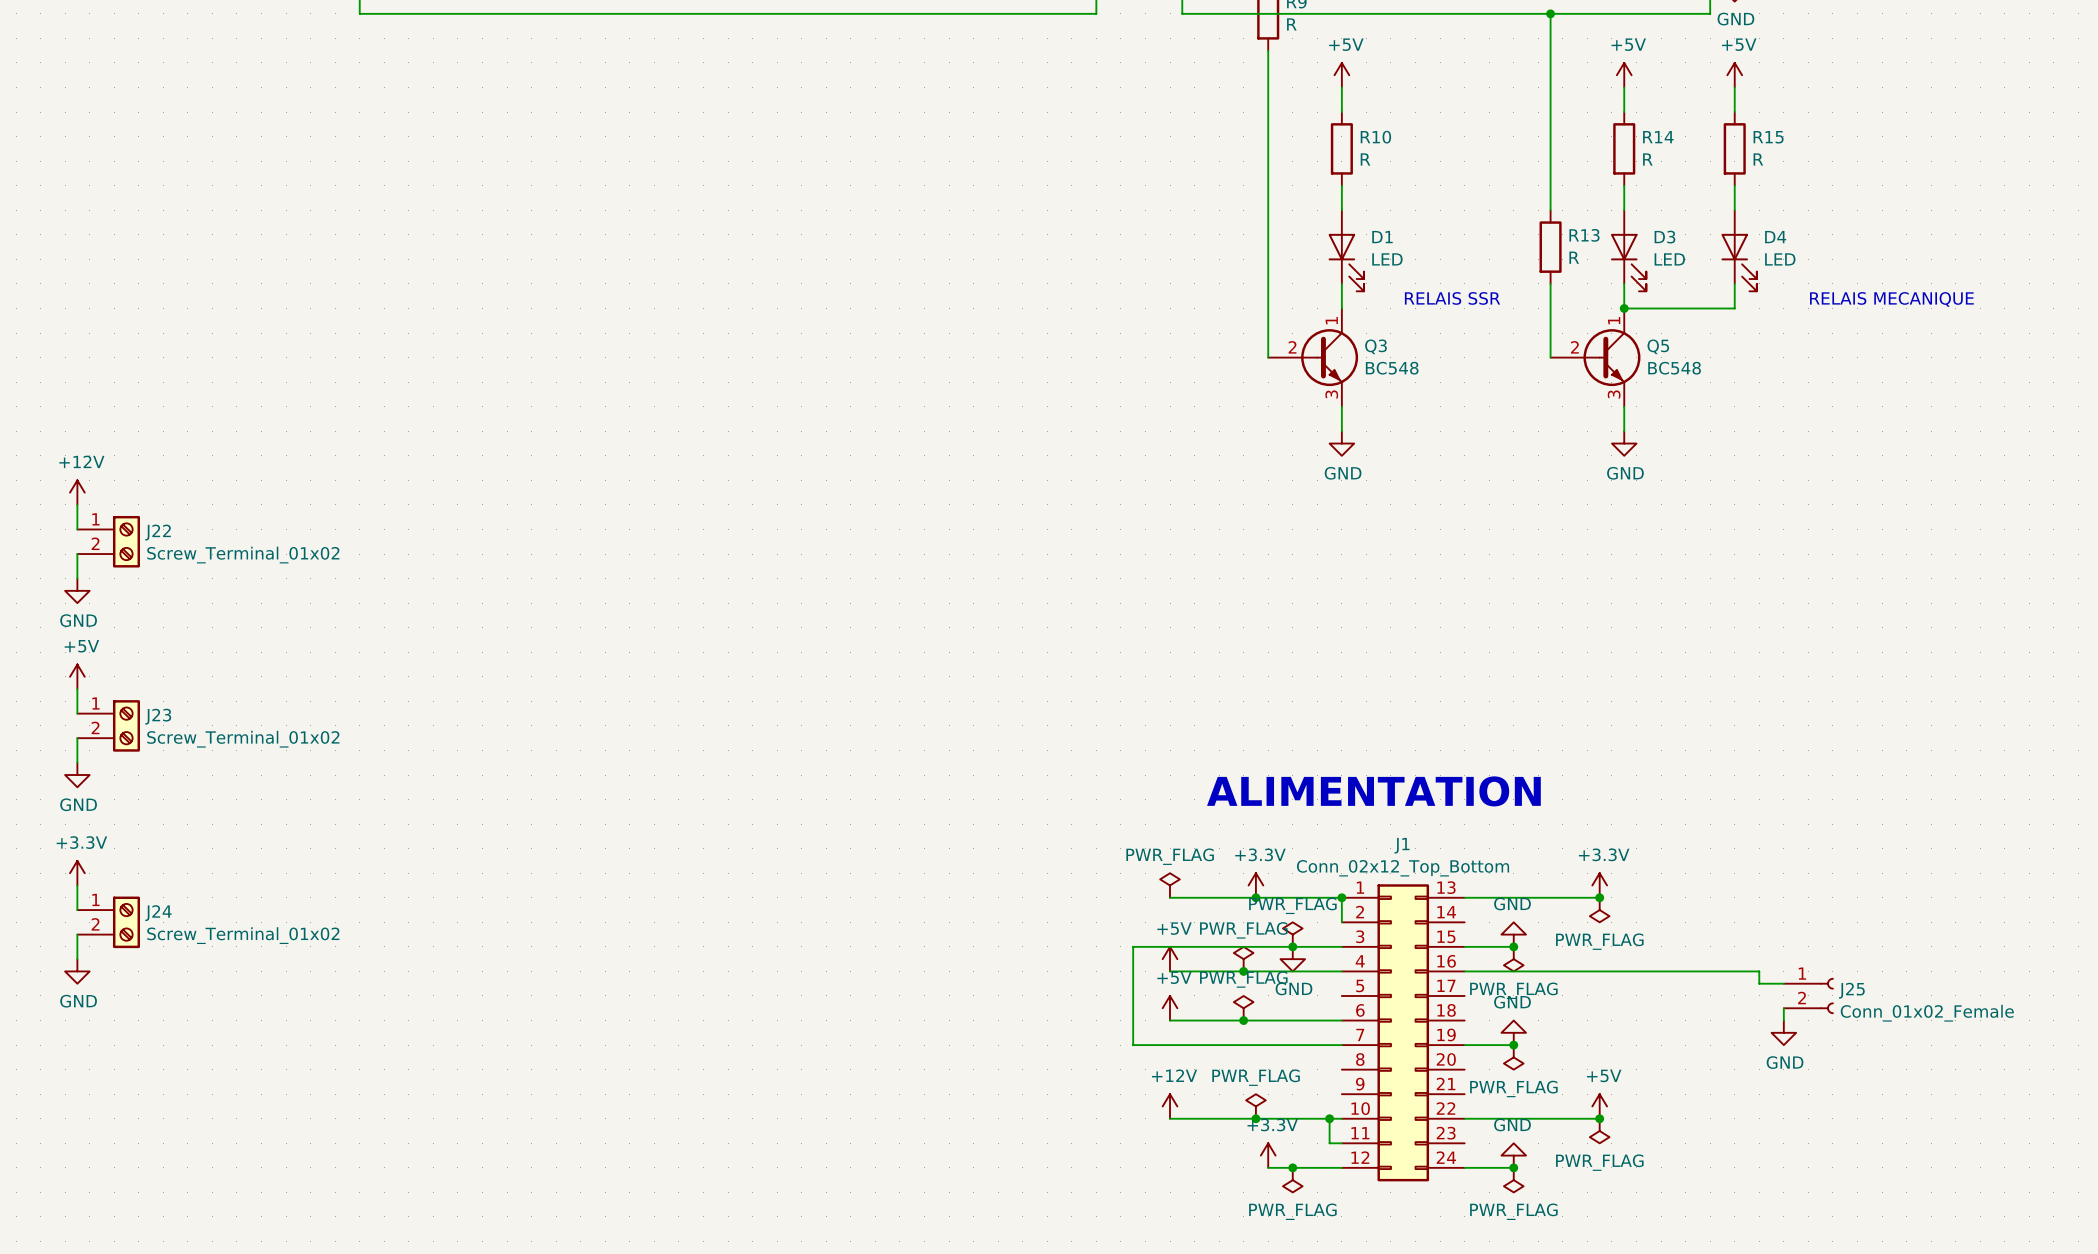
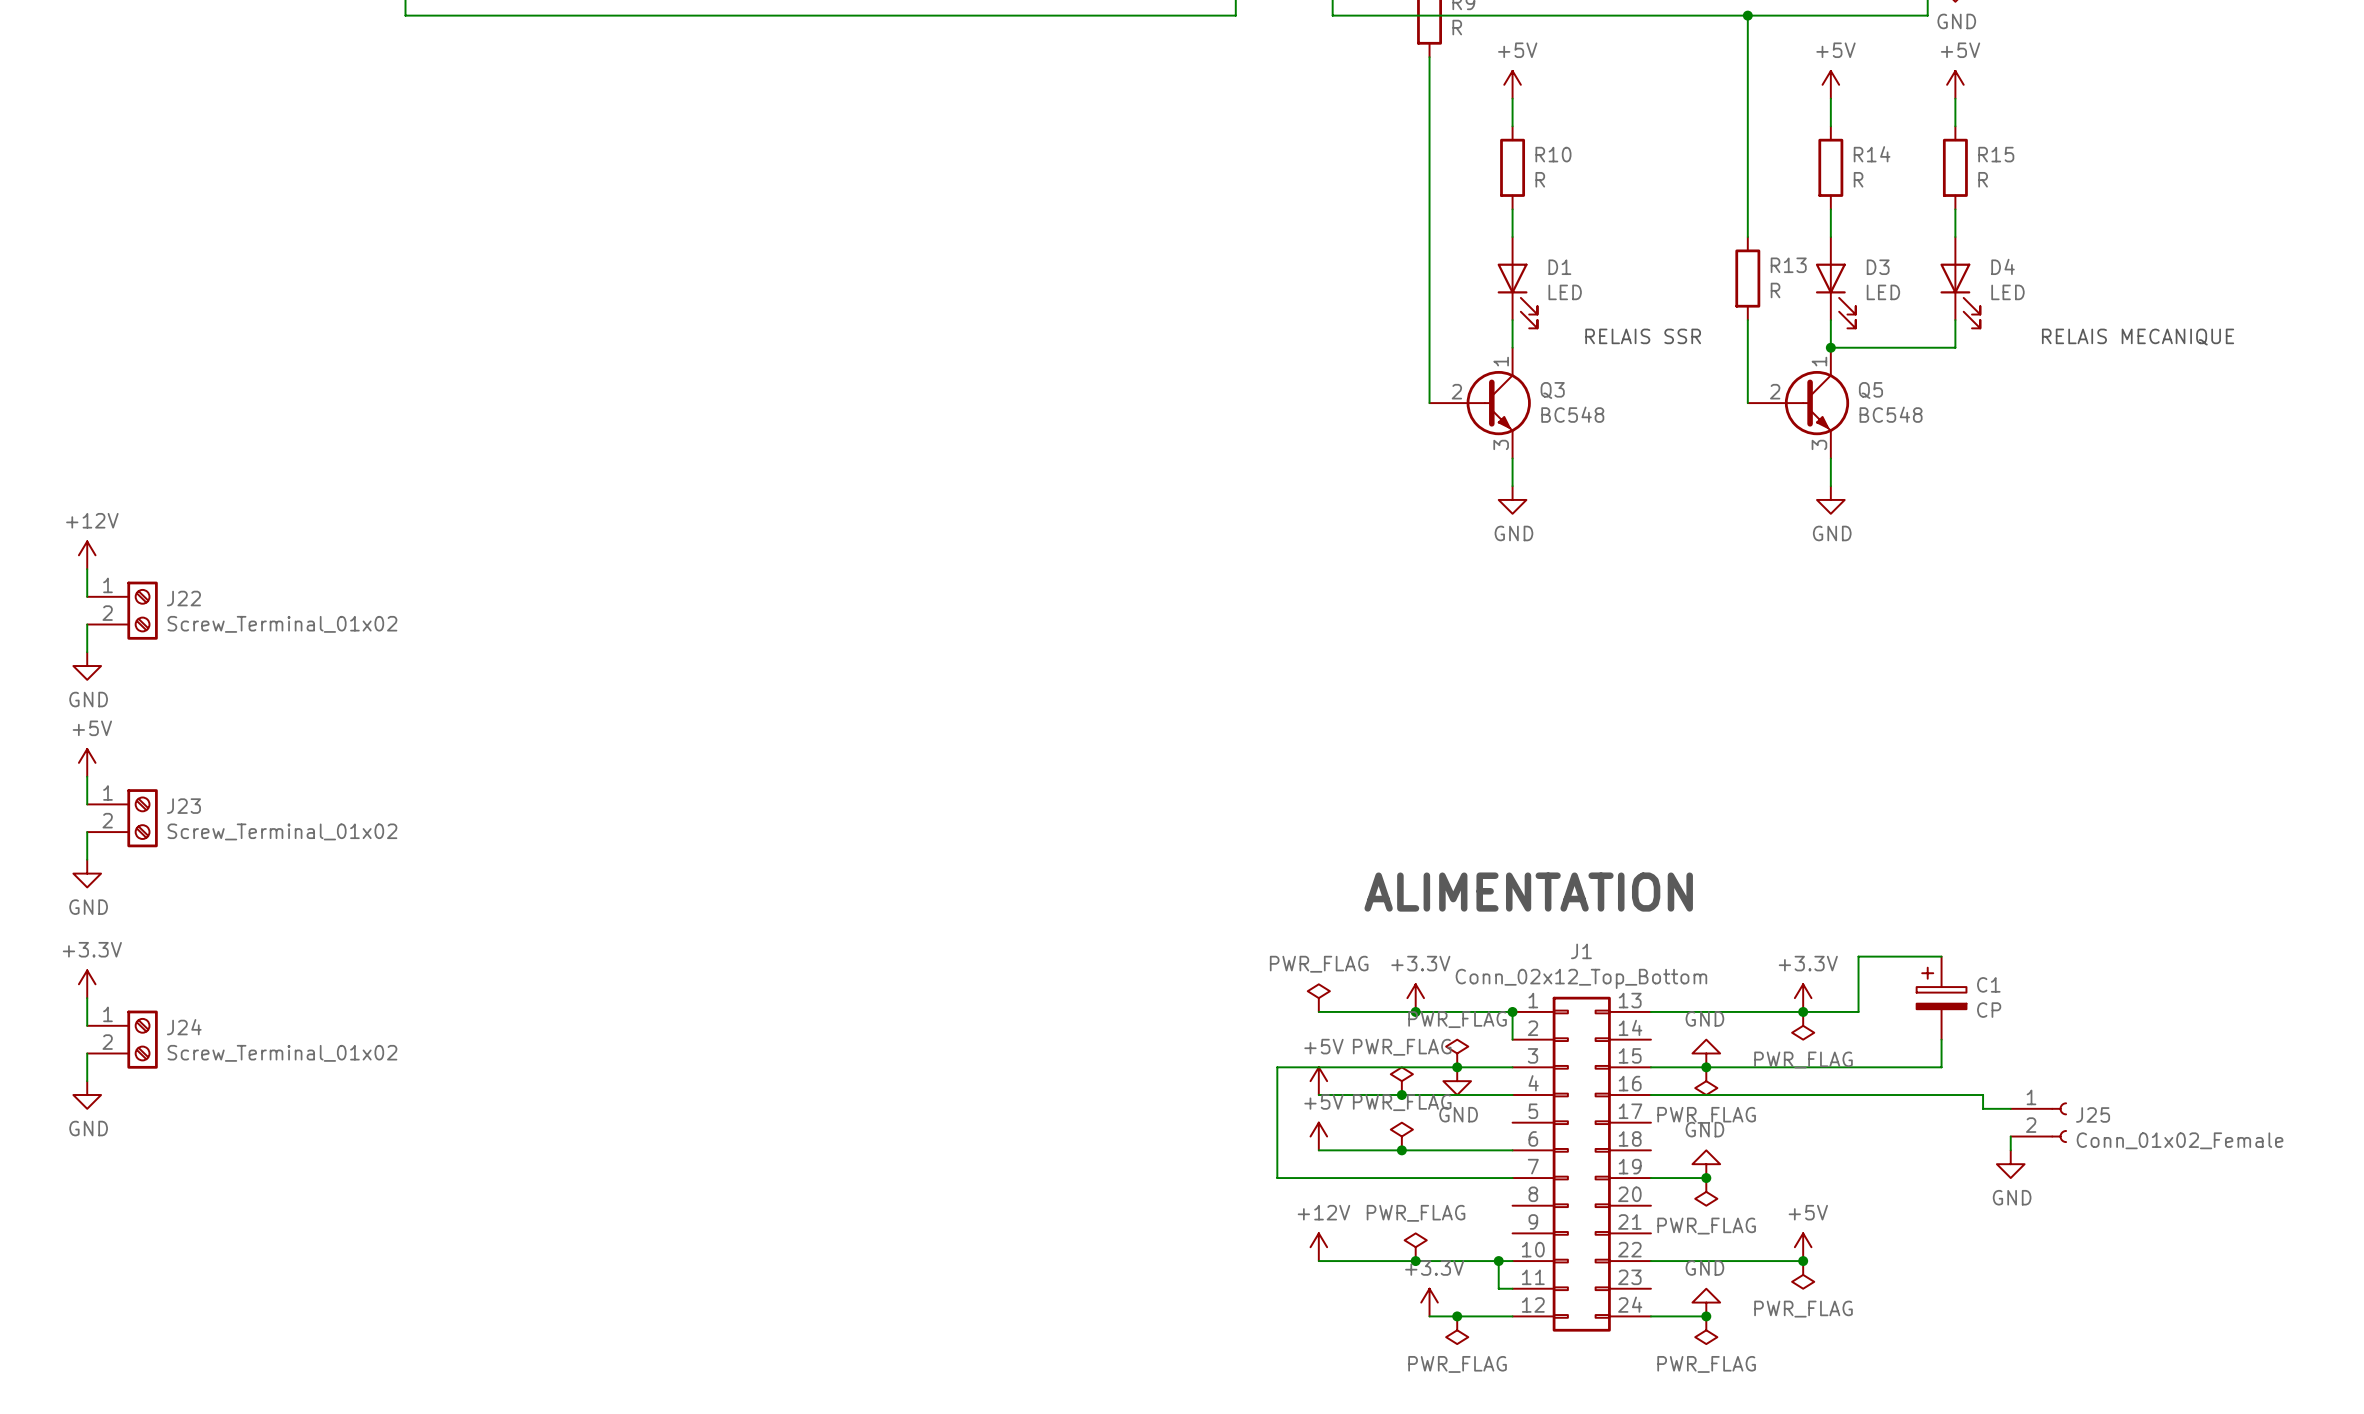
wire: none -> (1941, 956) (1858, 956) (1858, 1011) (1803, 1011)
C1: none -> CP (1941, 998)
wire: none -> (1941, 1039) (1941, 1067) (1706, 1067)

